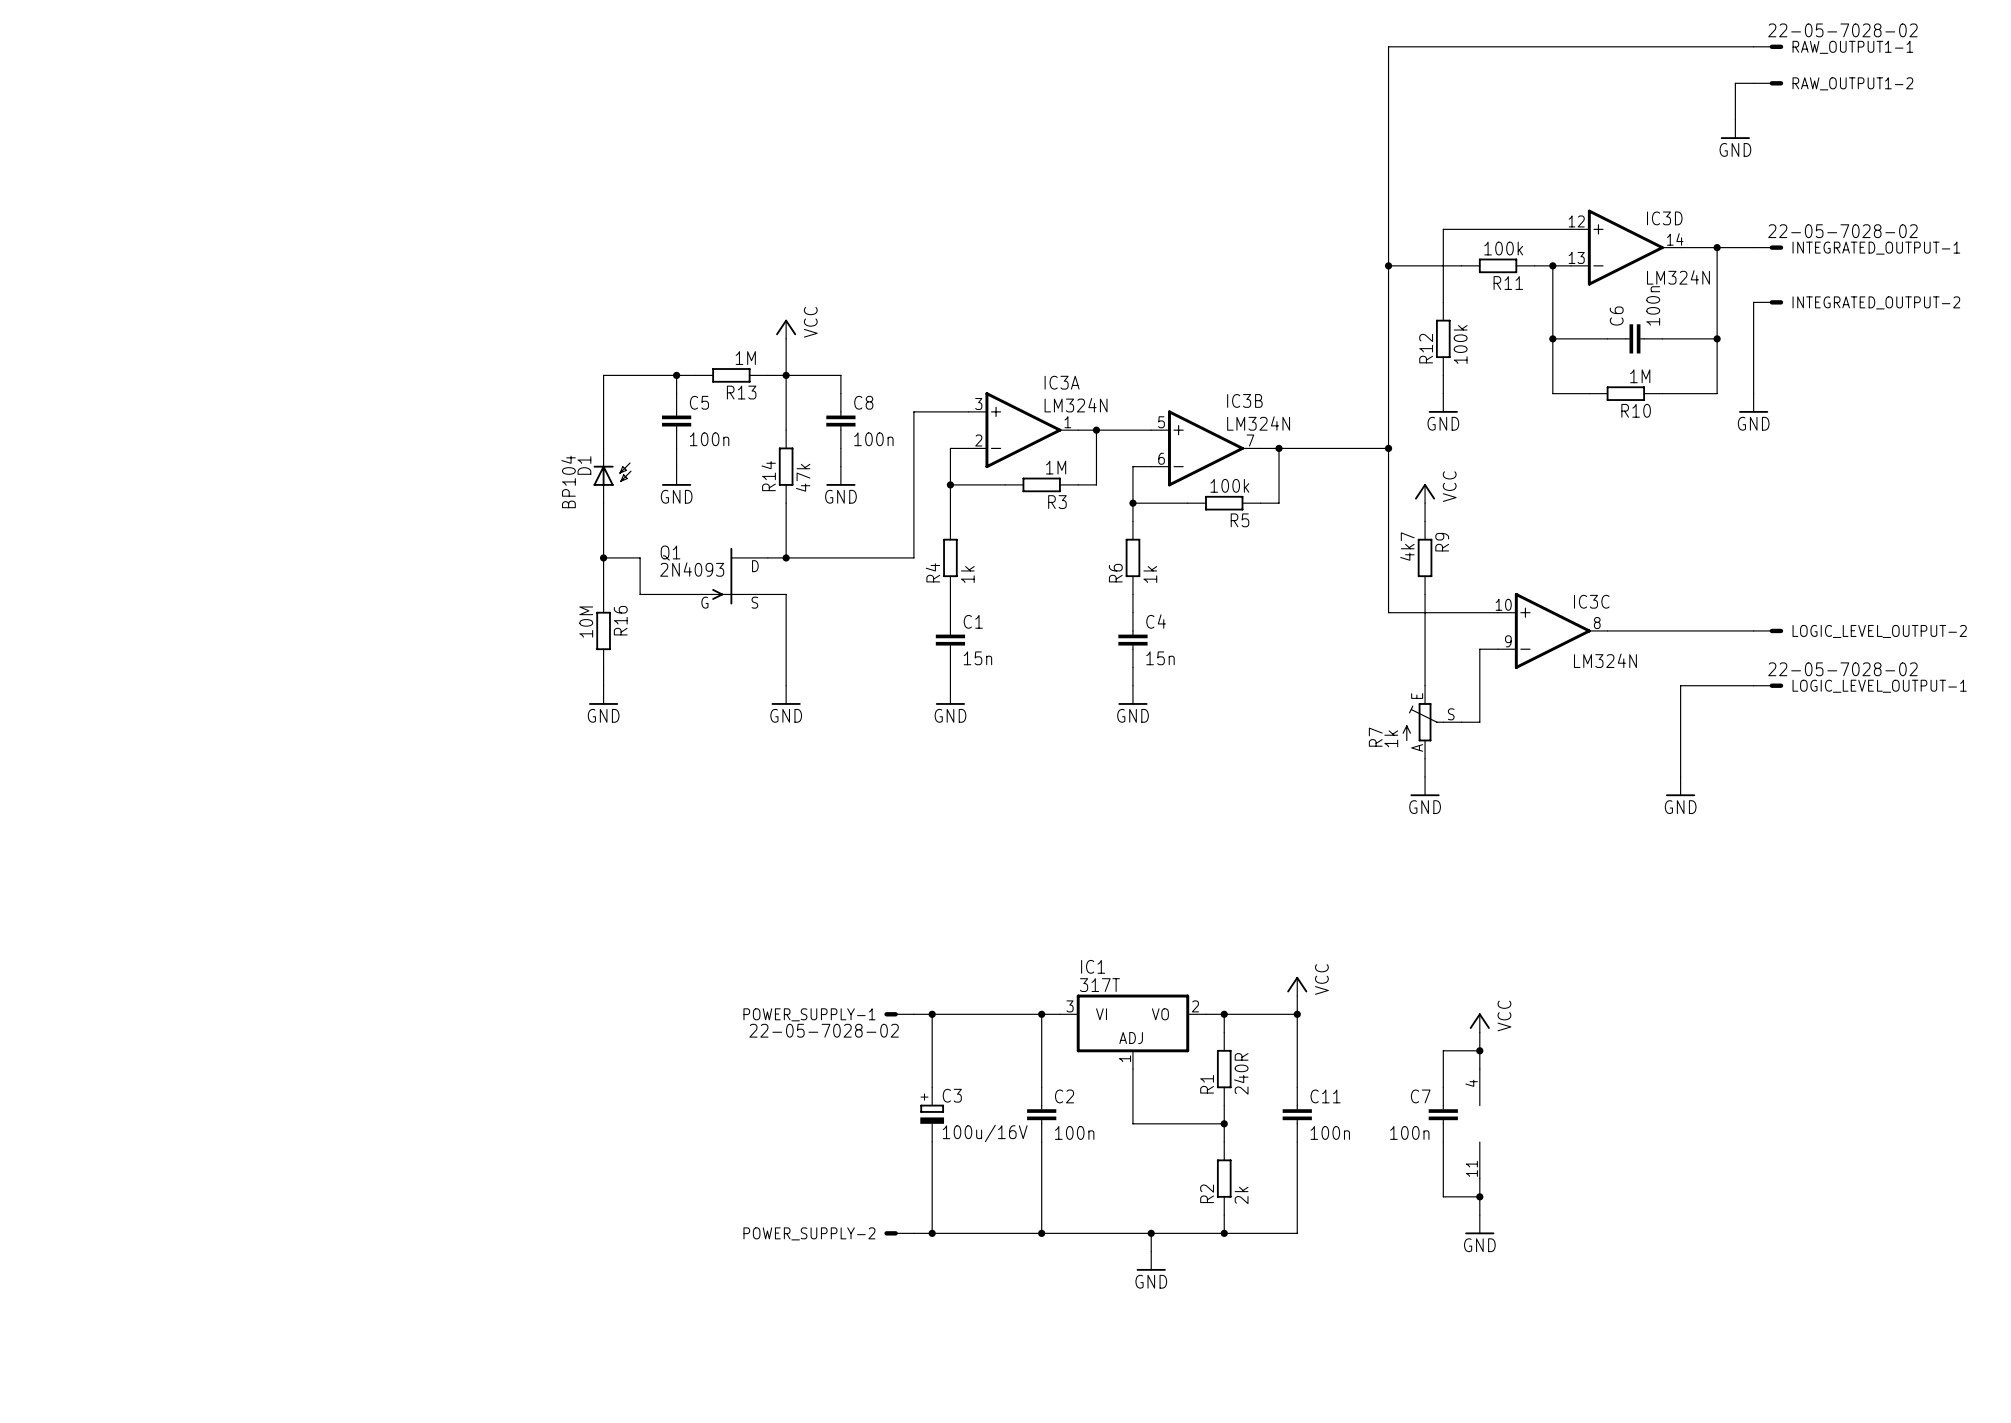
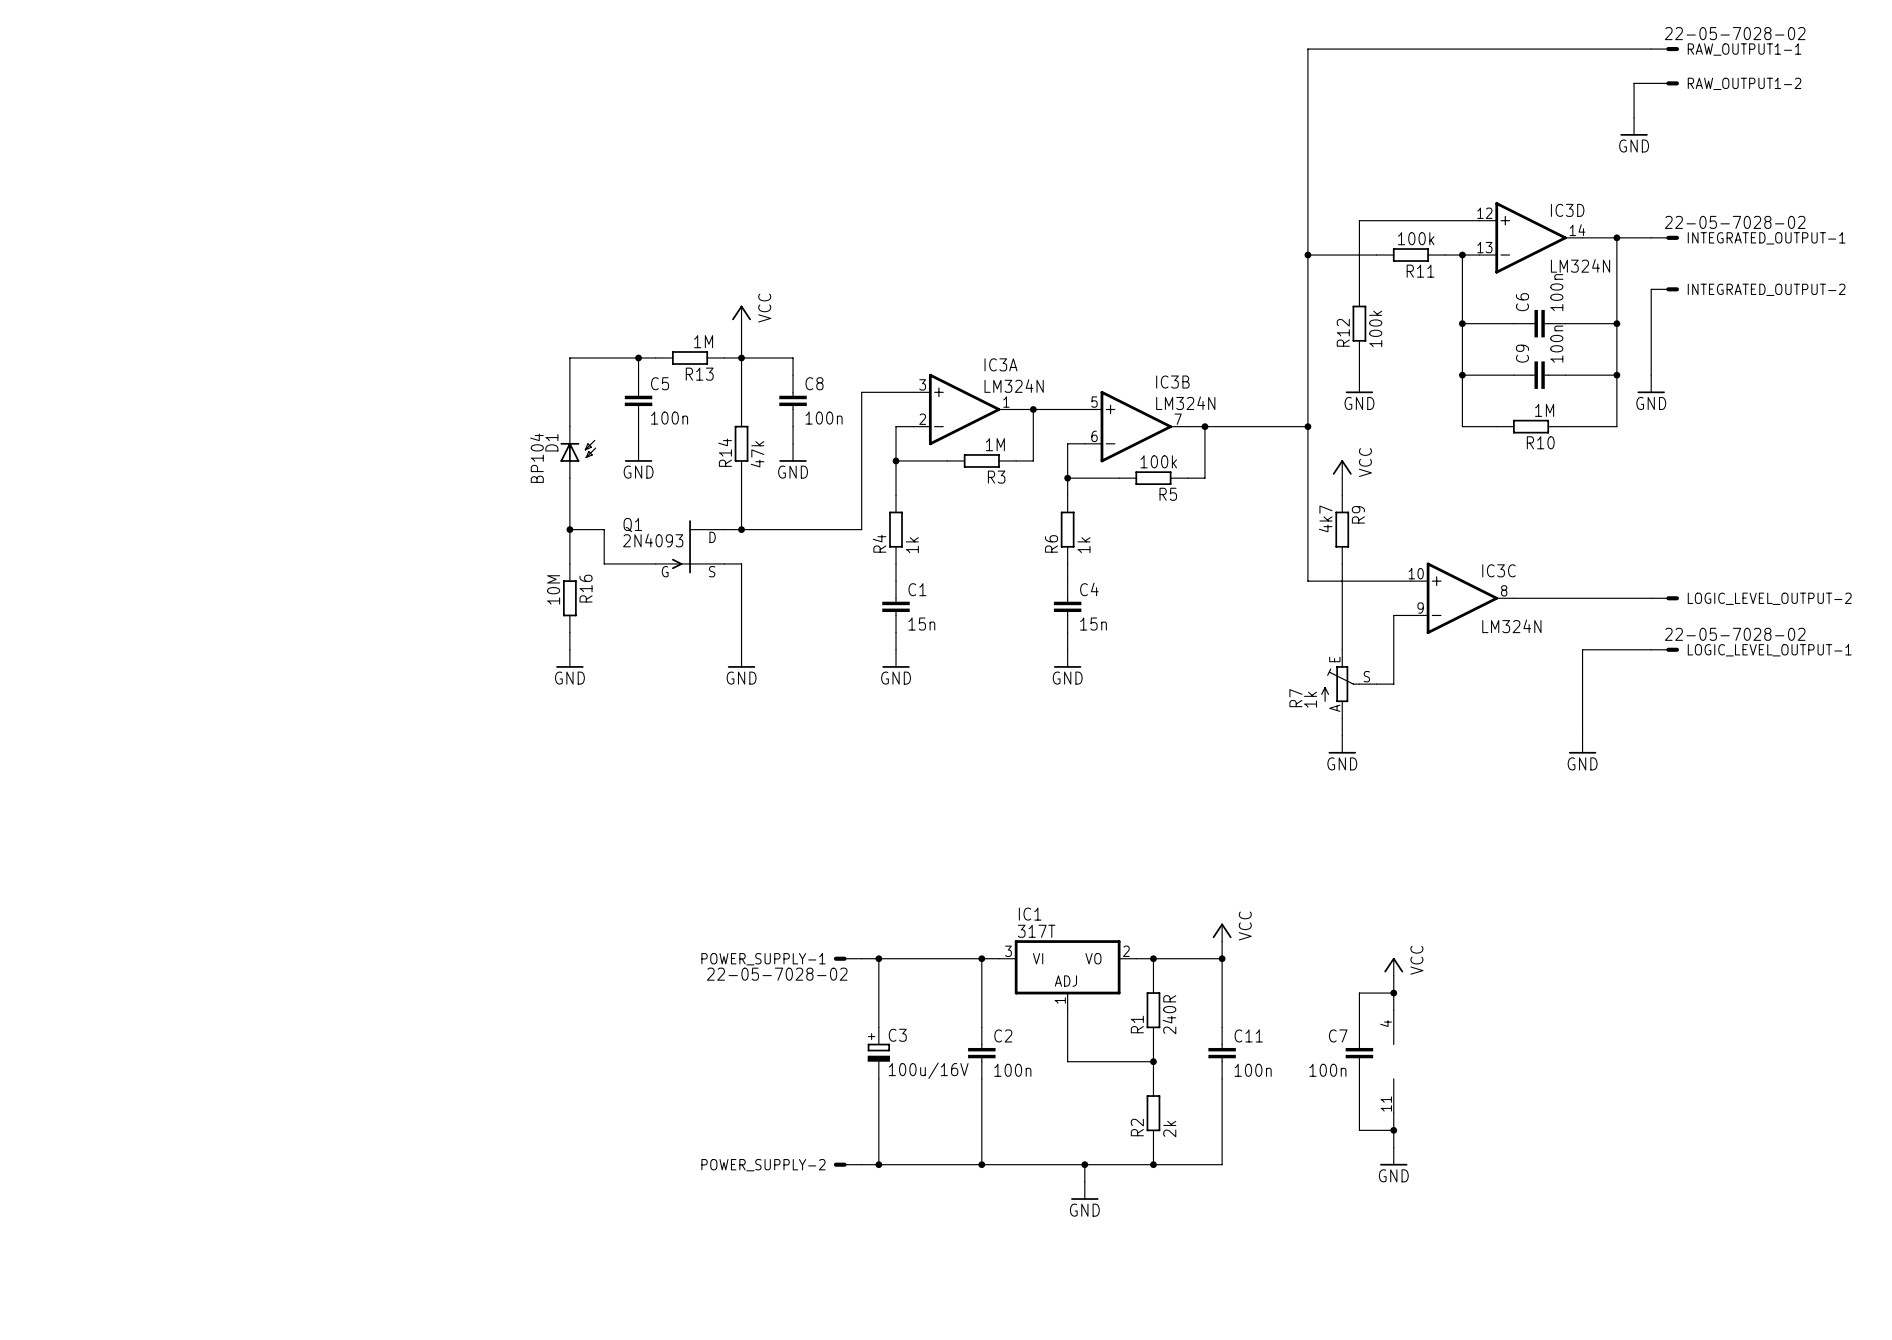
wire: none -> (1462, 375) (1462, 426) (1496, 426)
junction: none -> (1462, 375)
R10 position: (1625, 393) -> (1531, 426)
C9: none -> 100n (1539, 375)
wire: none -> (1616, 375) (1616, 426) (1565, 426)
junction: none -> (1616, 375)

